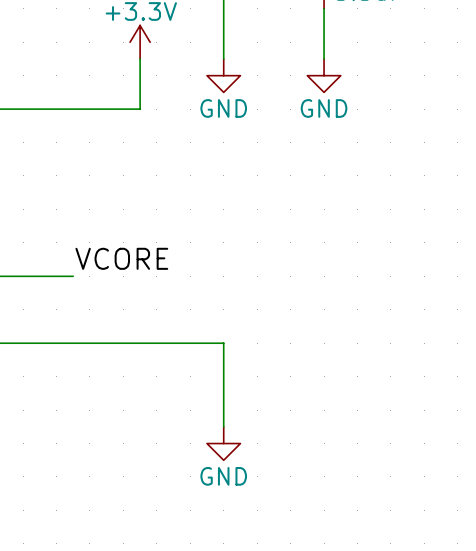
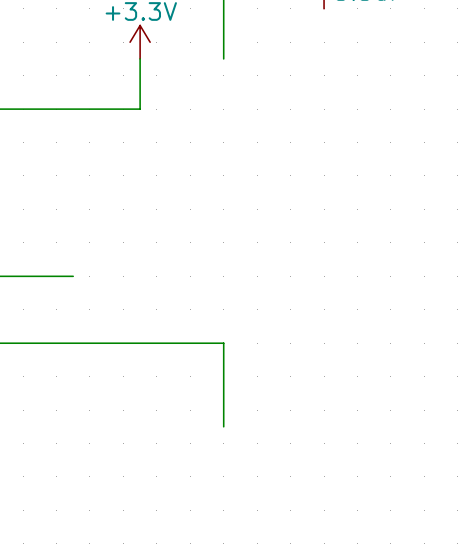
wire: (324, 8) (324, 58) -> none
power symbol: GND (223, 75) -> none
power symbol: GND (324, 75) -> none
label: VCORE (121, 258) -> none
power symbol: GND (223, 443) -> none

